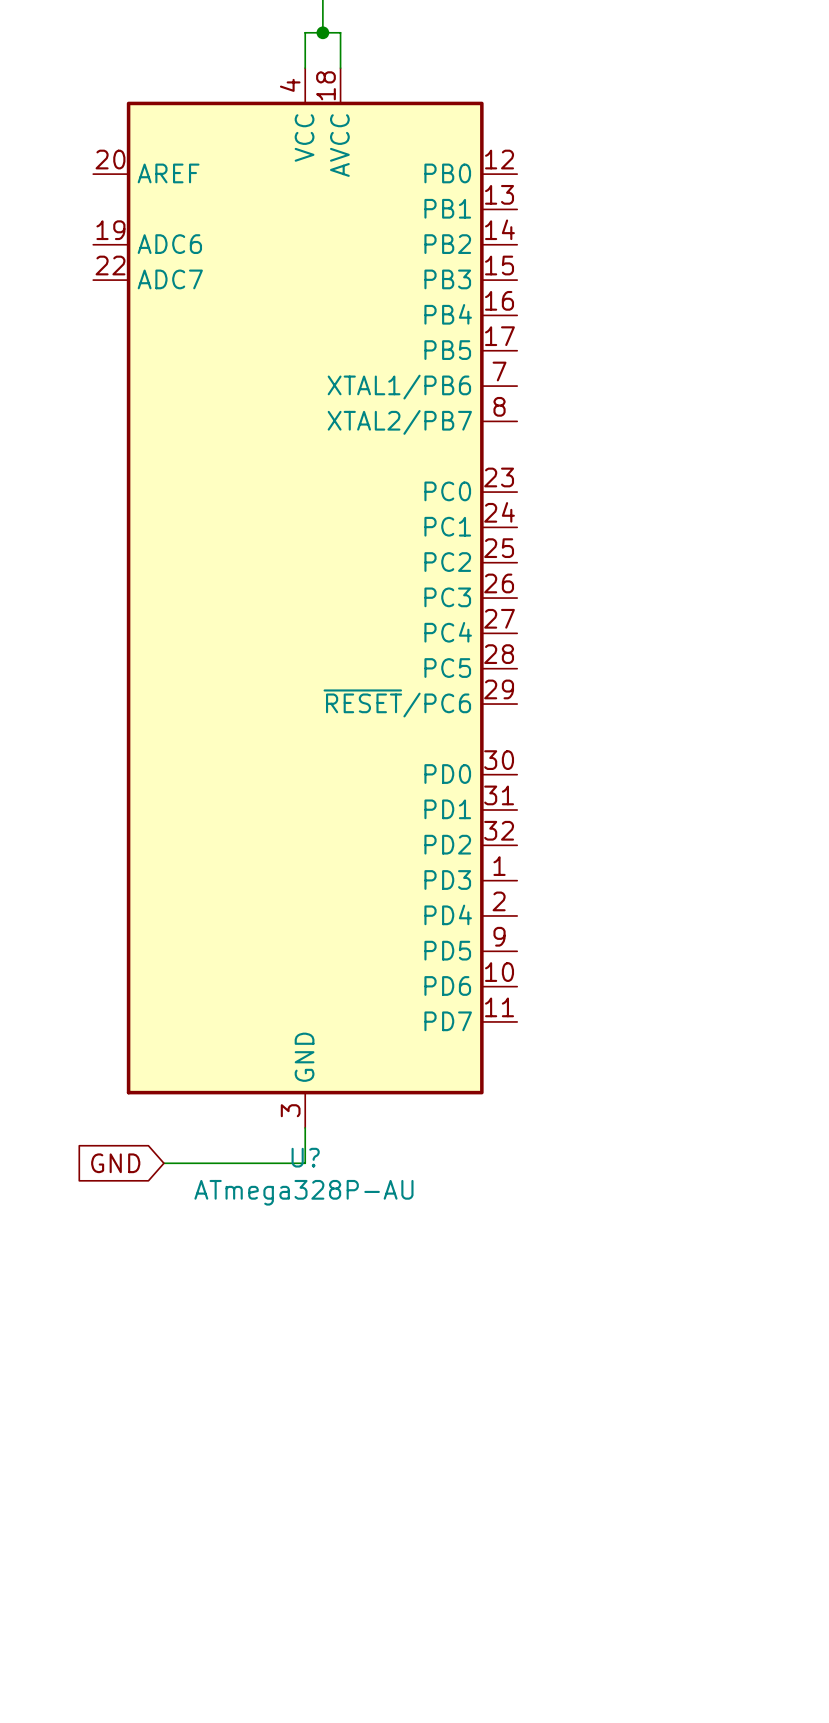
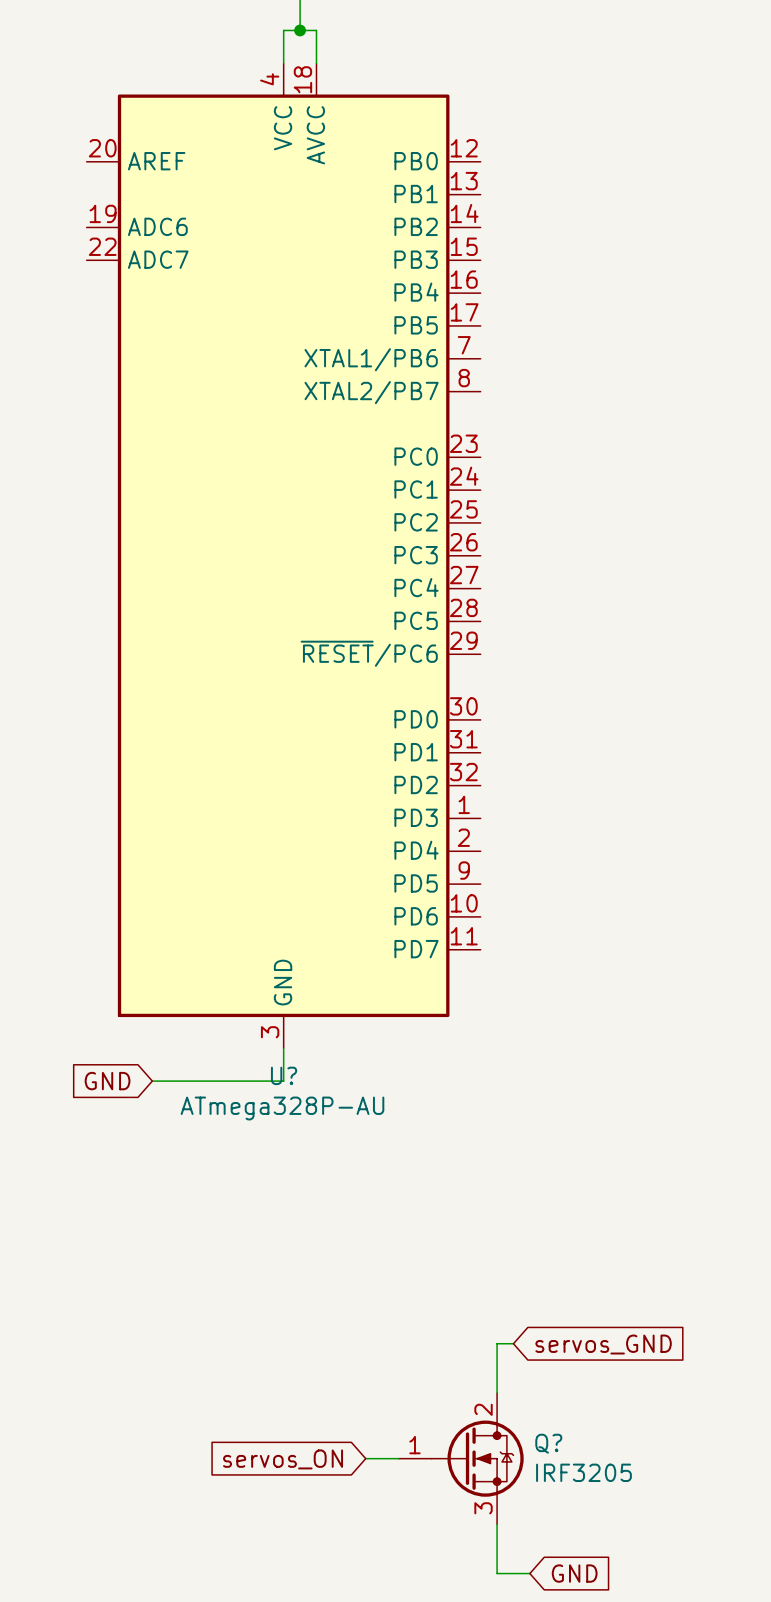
wire: none -> (513, 1343) (497, 1343) (497, 1392)
global label: none -> servos_GND (603, 1344)
wire: none -> (365, 1458) (398, 1458)
Q?: none -> IRF3205 (461, 1458)
global label: none -> servos_ON (283, 1459)
wire: none -> (497, 1524) (497, 1573) (529, 1573)
global label: none -> GND (574, 1573)

